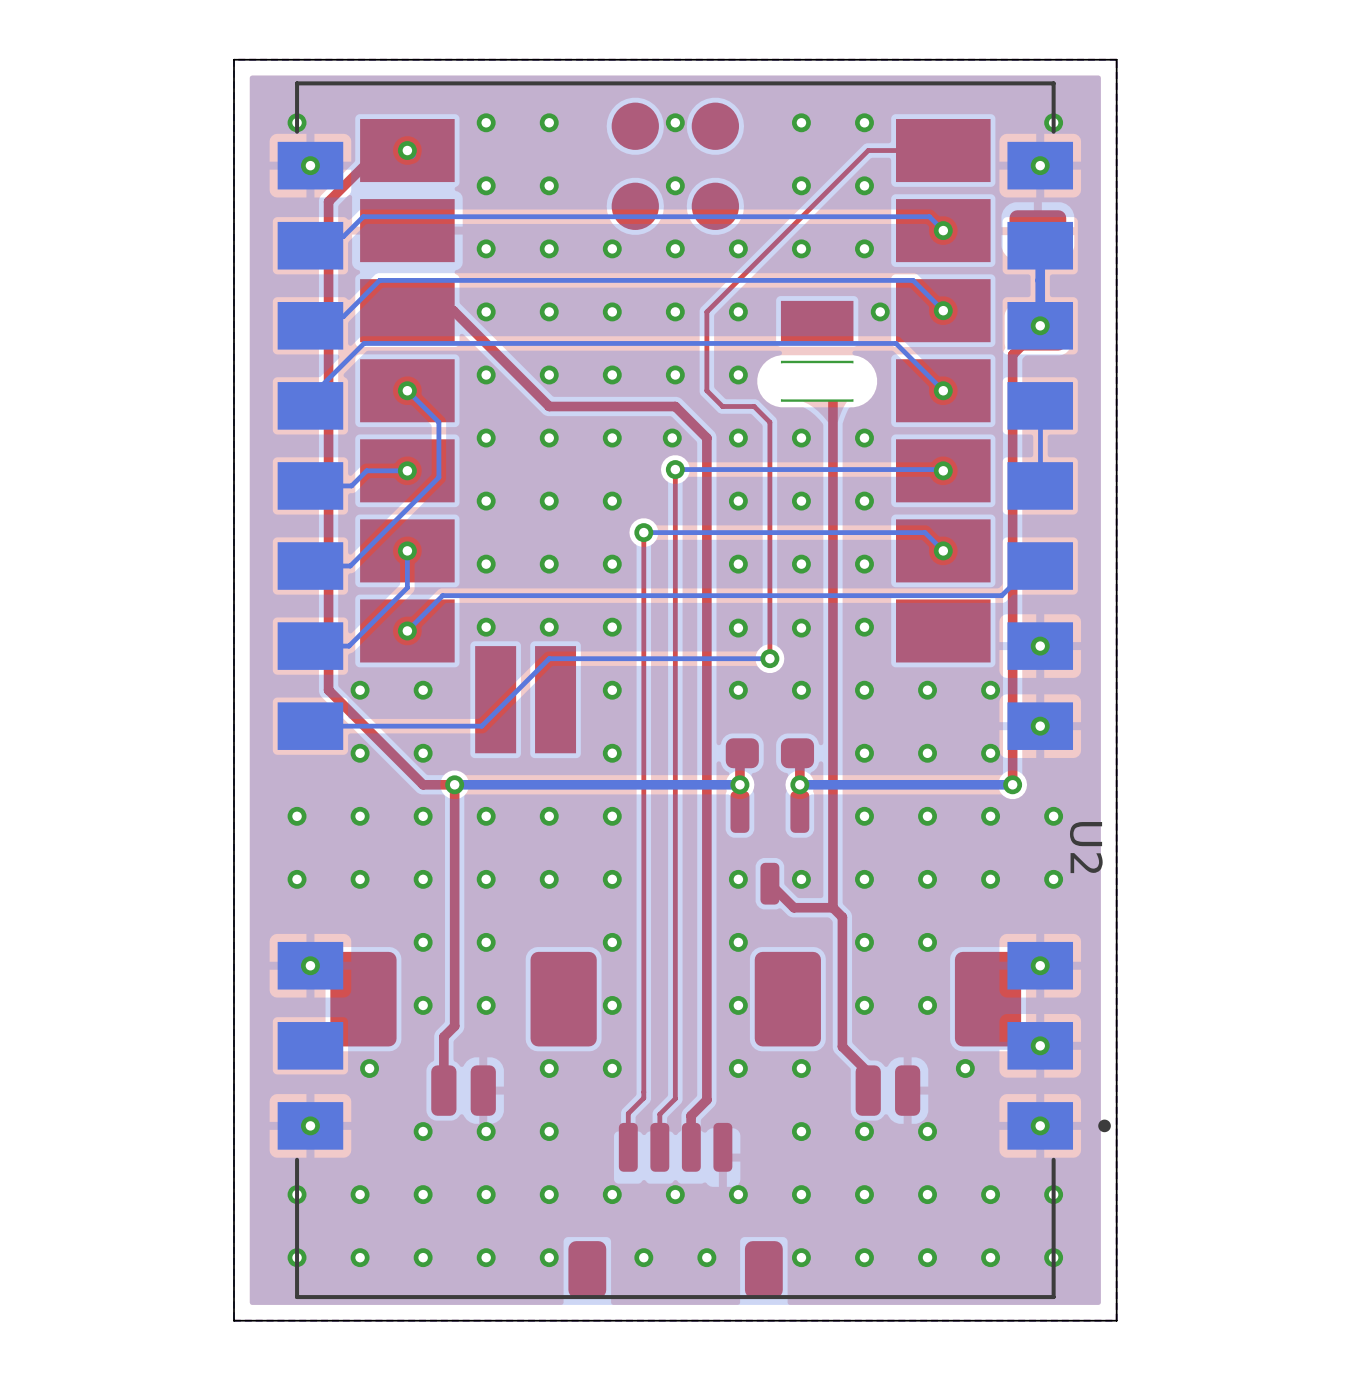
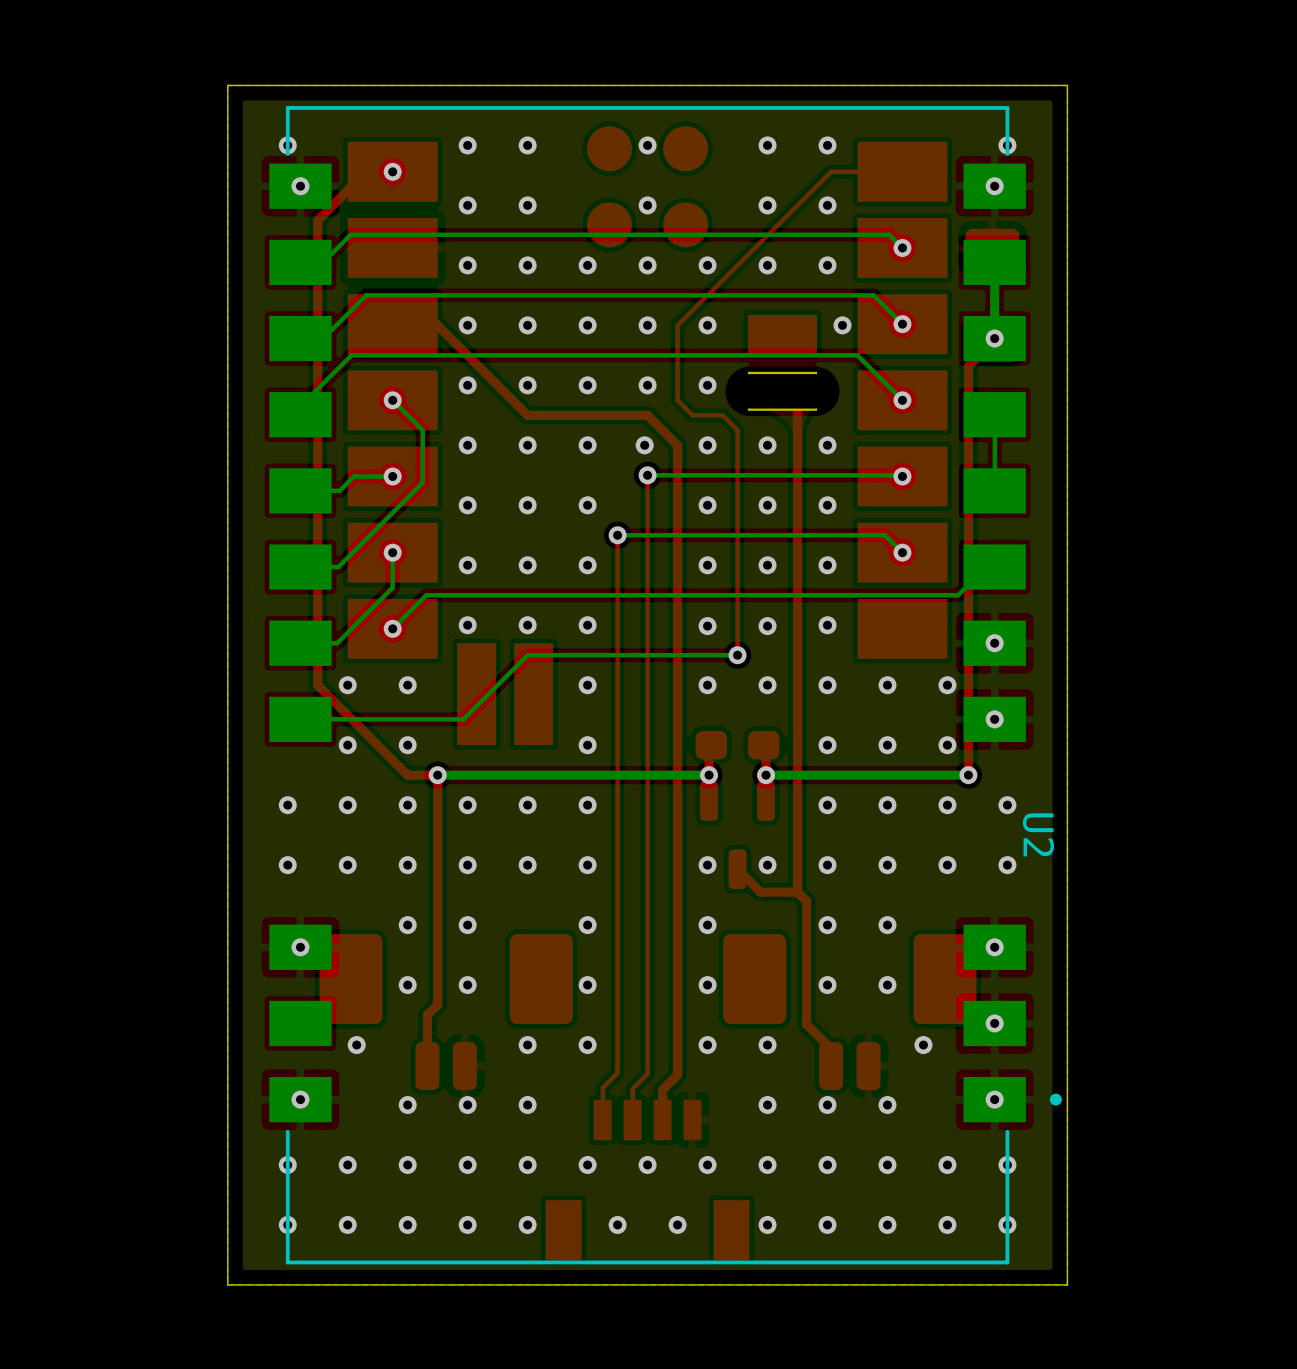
part footprint: [568, 1122, 783, 1298] -> [545, 1099, 750, 1261]

